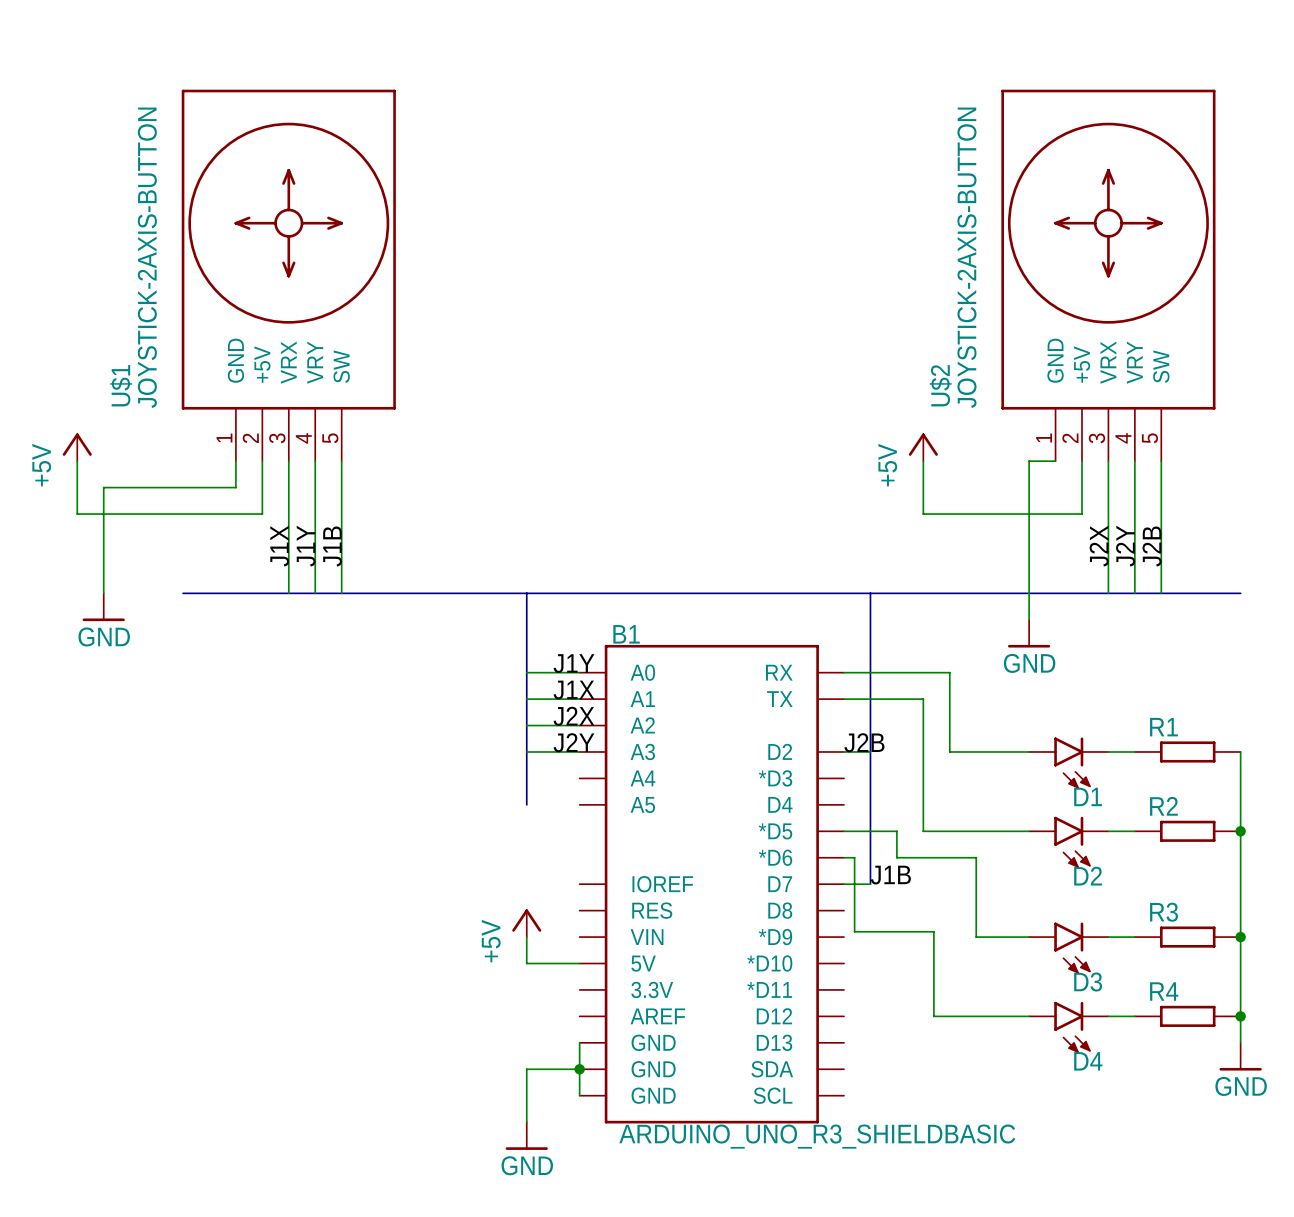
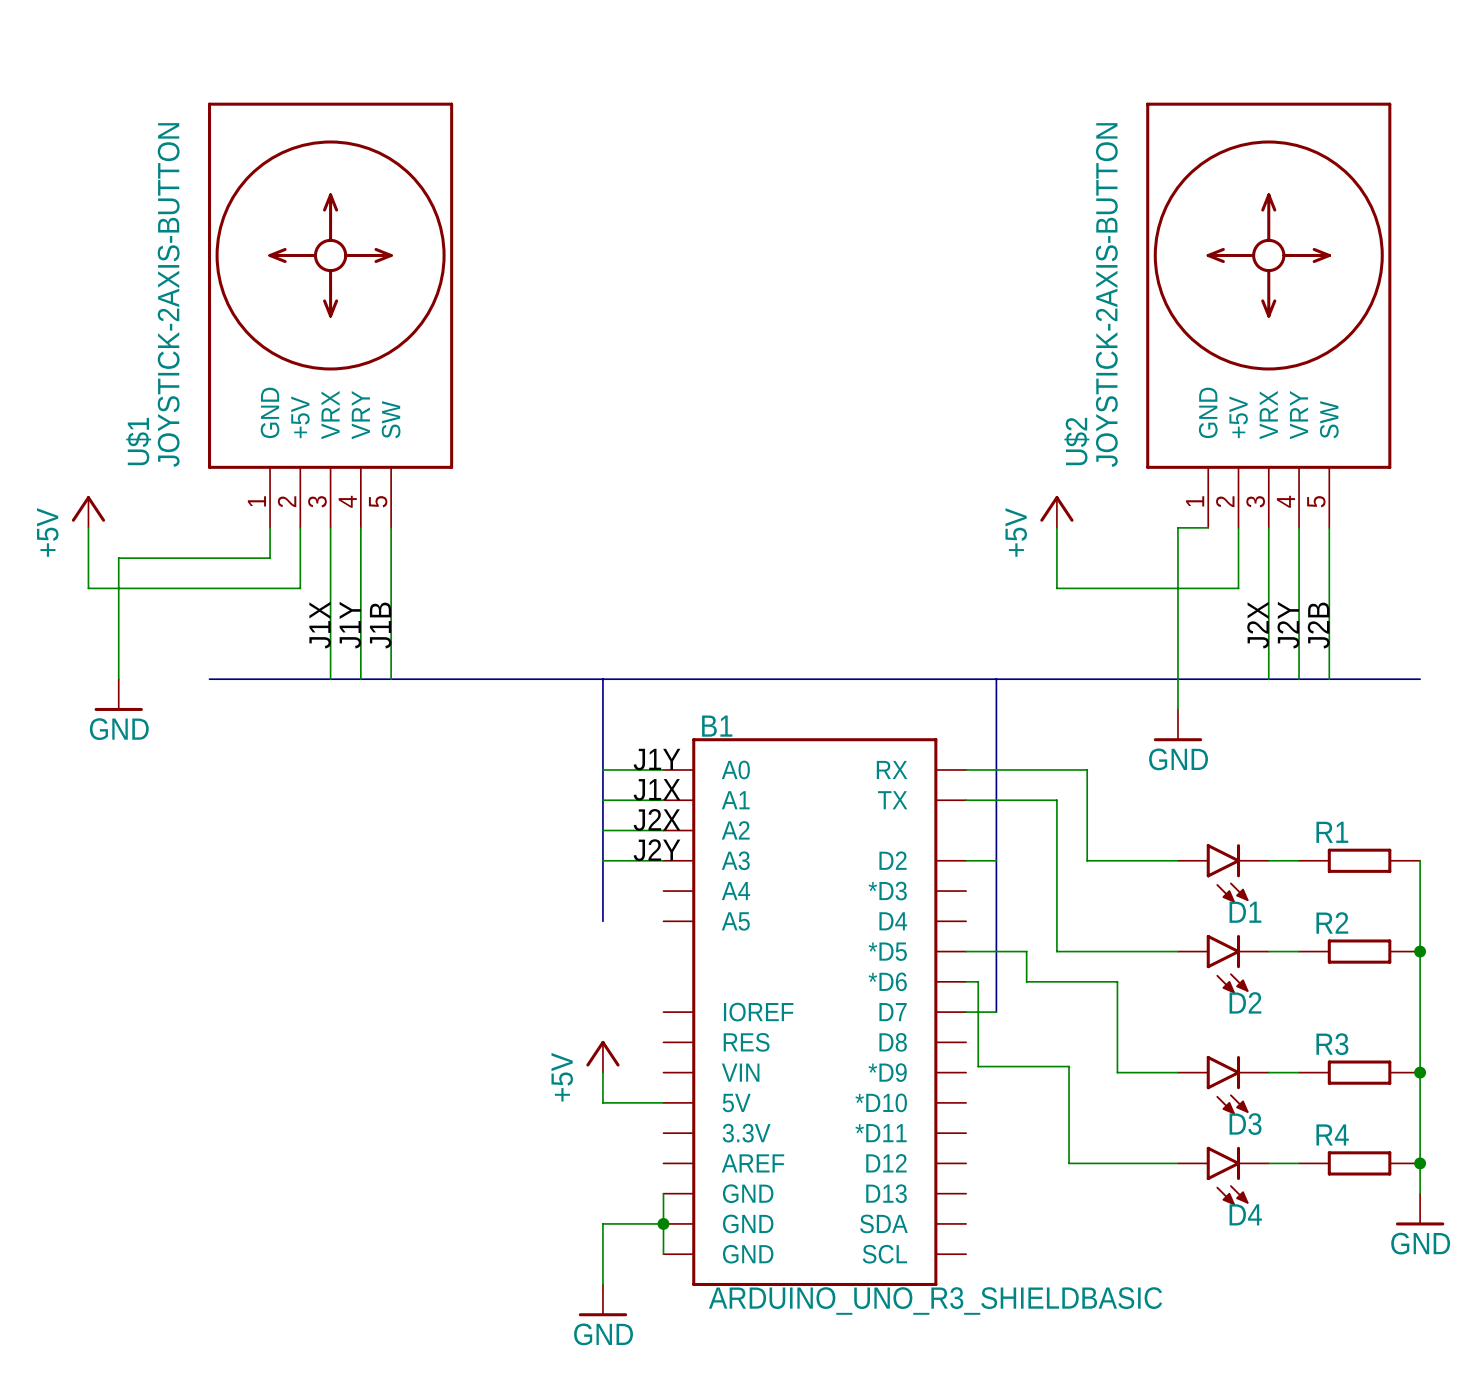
label: J2B (864, 742) -> none
label: J1B (890, 875) -> none

